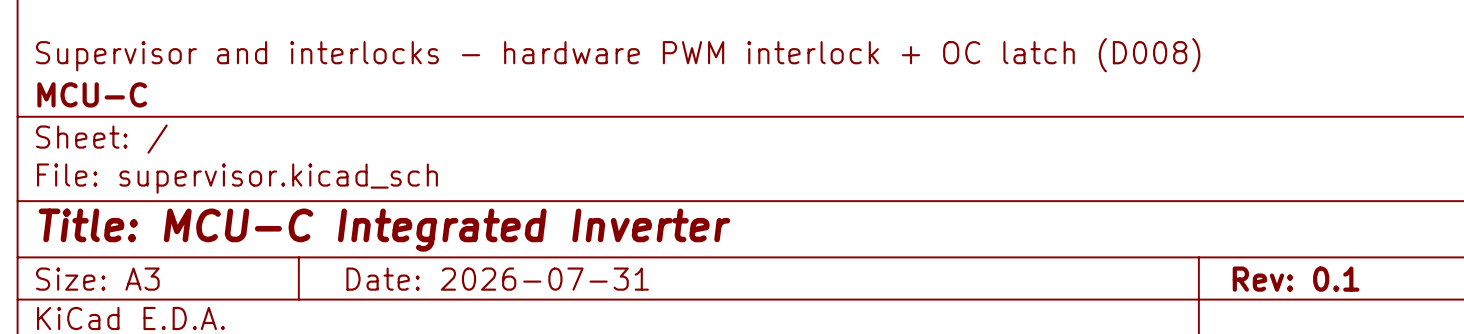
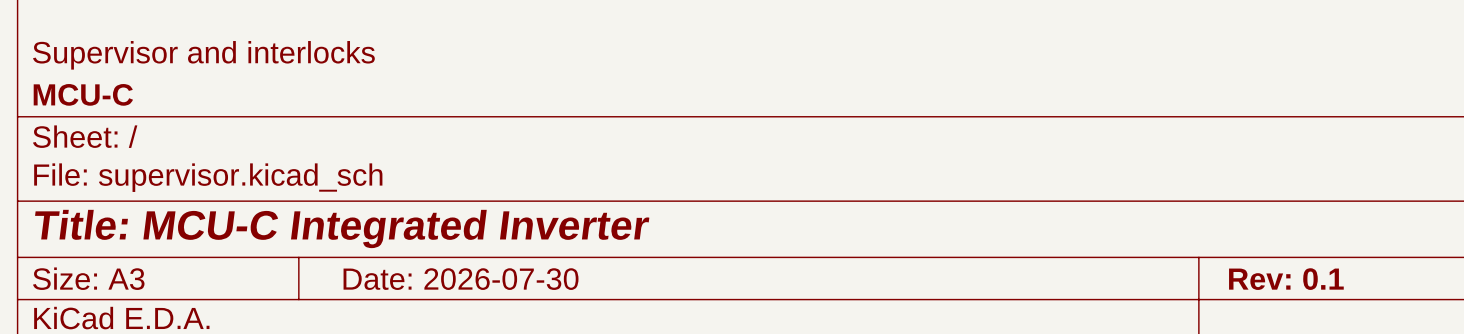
title block: Supervisor and interlocks - hardware PWM interlock + OC latch (D008) (618, 55) -> Supervisor and interlocks (203, 55)
title block: Date: 2026-07-31 (497, 279) -> Date: 2026-07-30 (461, 279)

